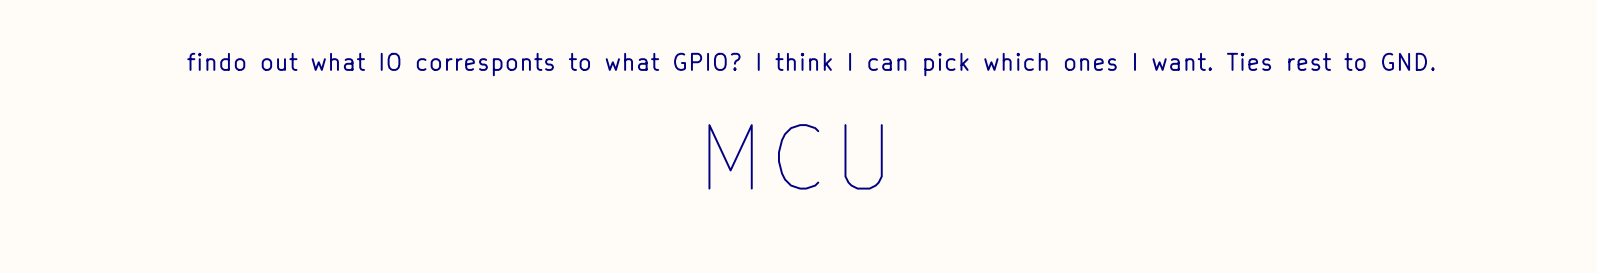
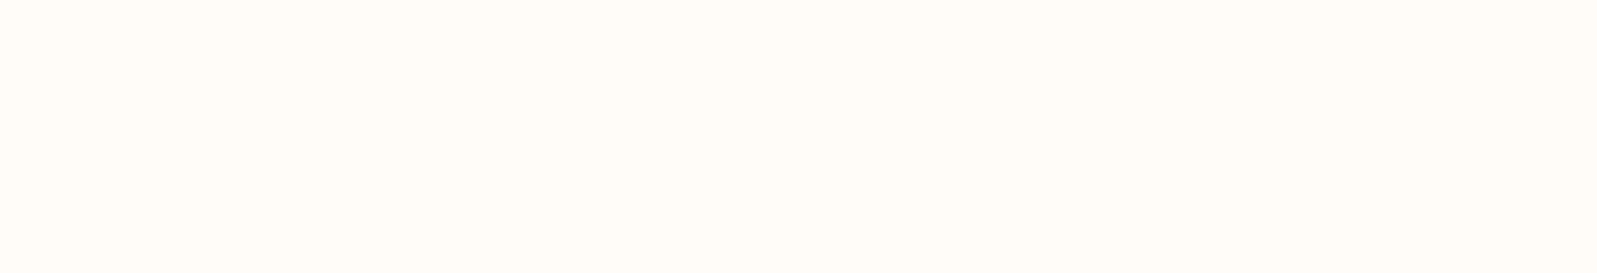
text: findo out what IO corresponts to what GPIO? I think I can pick which ones I want. Ties rest to GND. (810, 64) -> none
text: MCU (795, 156) -> none

